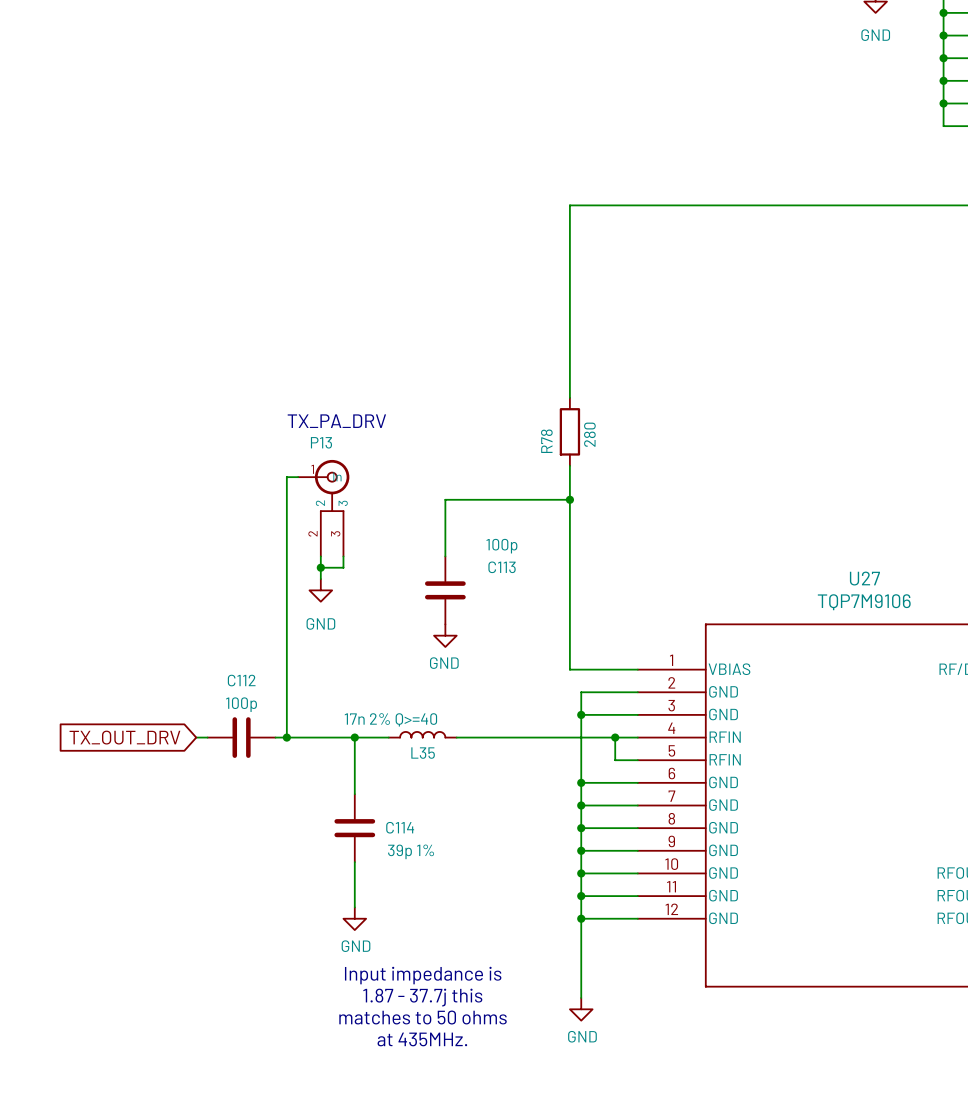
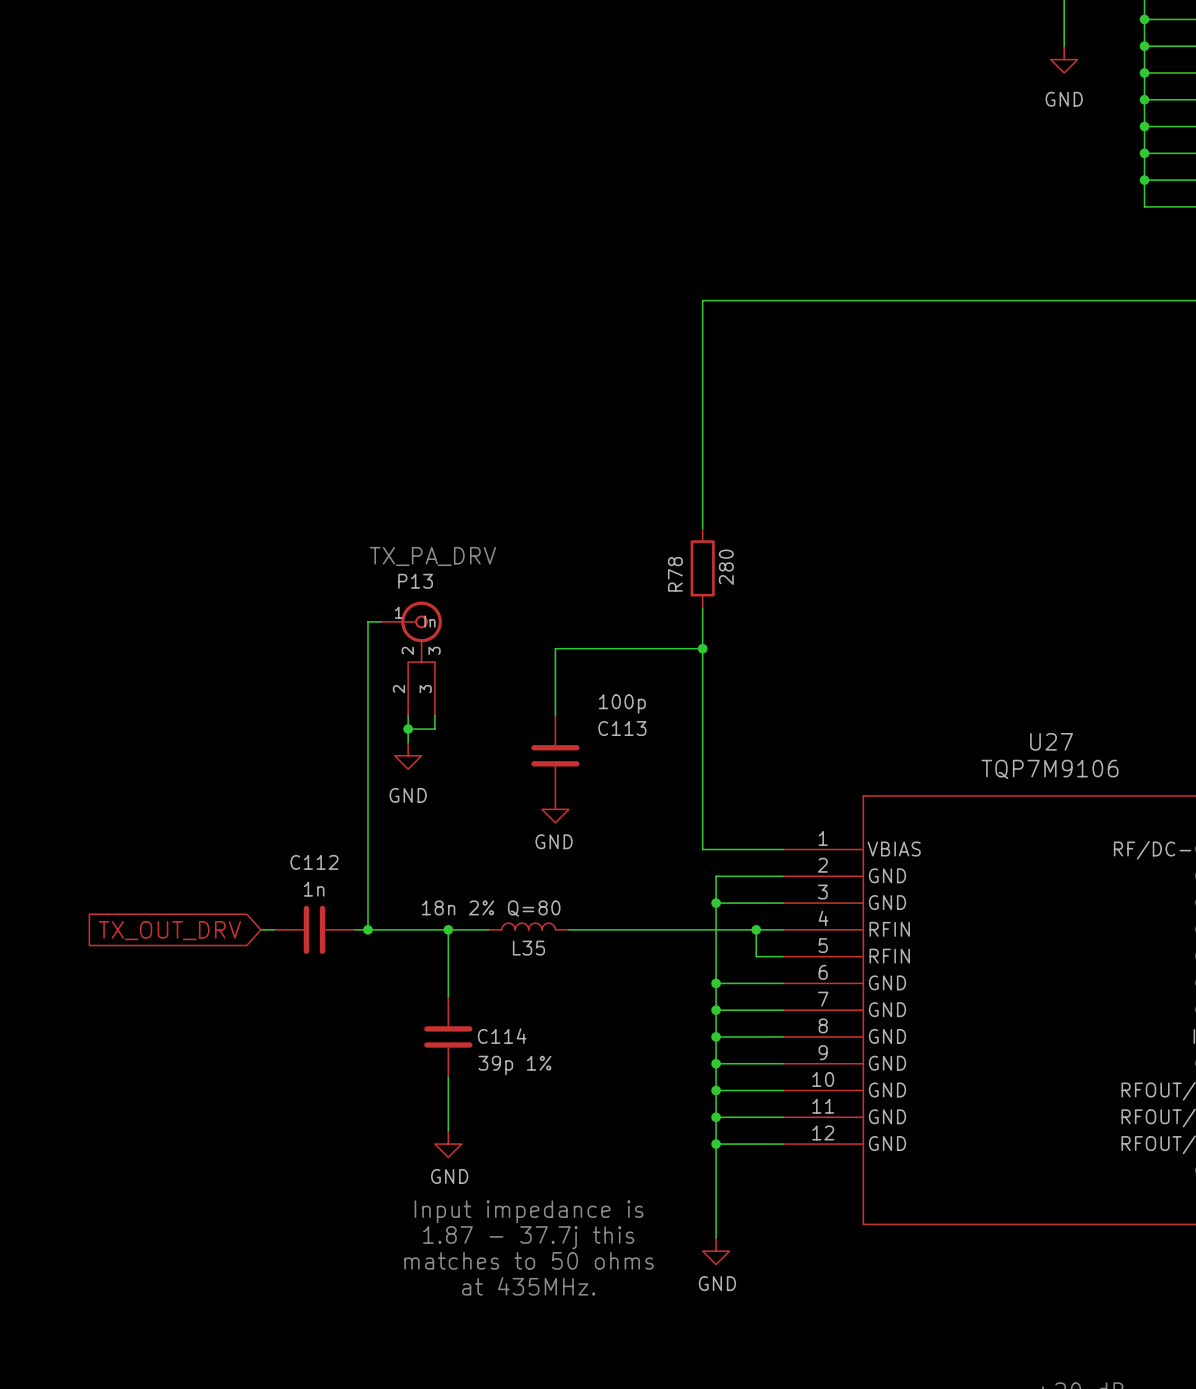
C112 value: 100p (241, 704) -> 1n (314, 889)
L35 value: 17n 2% Q>=40 (390, 719) -> 18n 2% Q=80 (491, 908)

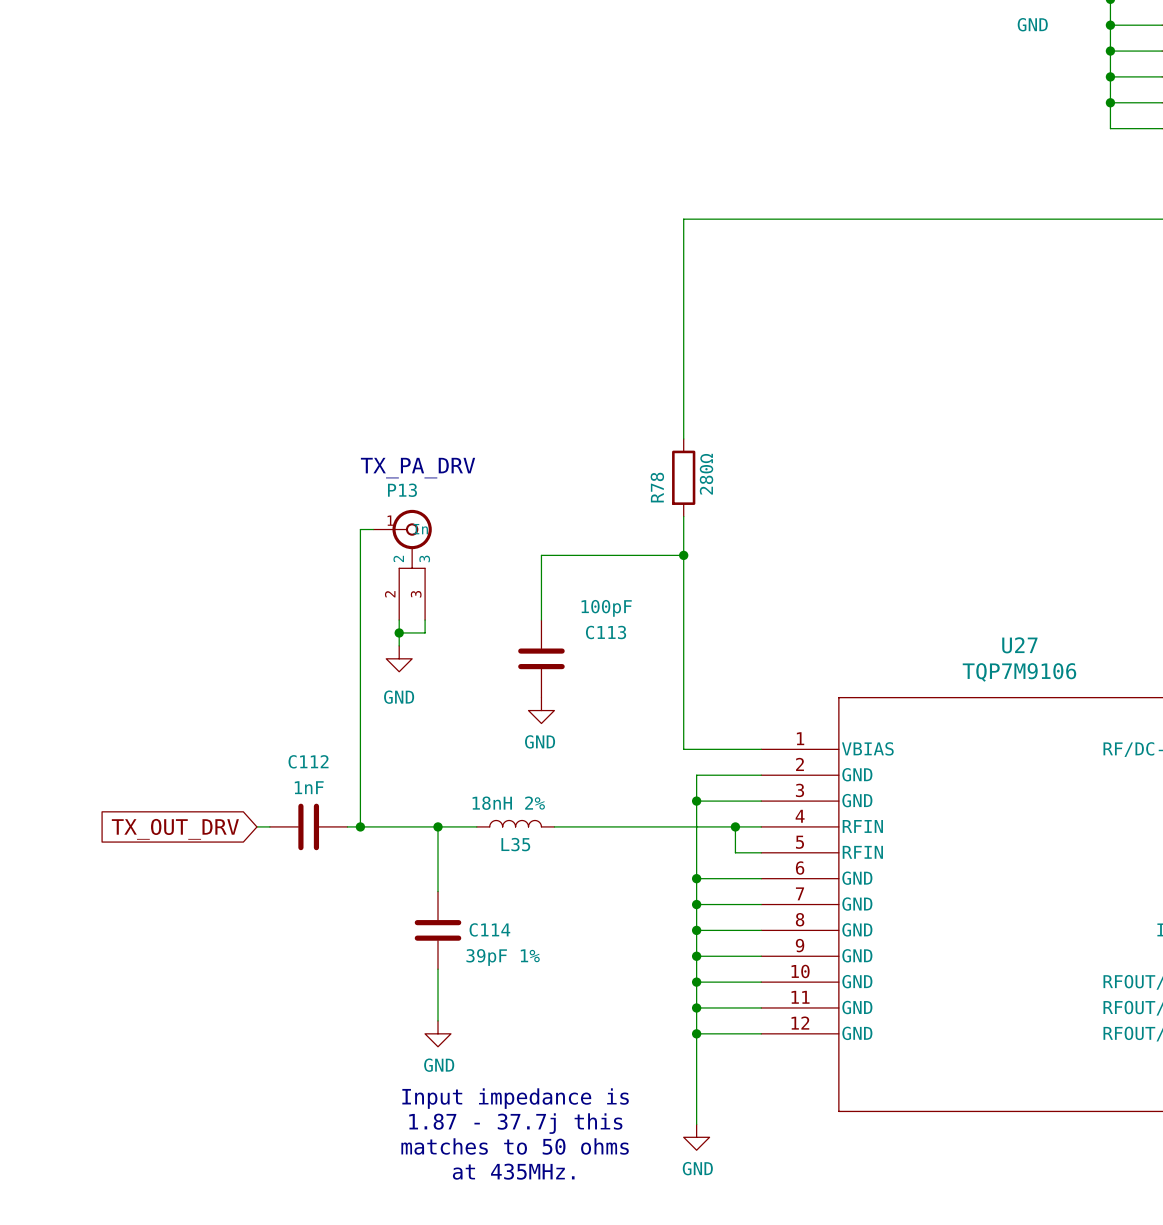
R78 value: 280 (726, 567) -> 280Ω (706, 474)
C113 value: 100p (622, 703) -> 100pF (606, 608)
C112 value: 1n (314, 889) -> 1nF (309, 787)
L35 value: 18n 2% Q=80 (491, 908) -> 18nH 2% (508, 803)
C114 value: 39p 1% (514, 1065) -> 39pF 1% (503, 957)

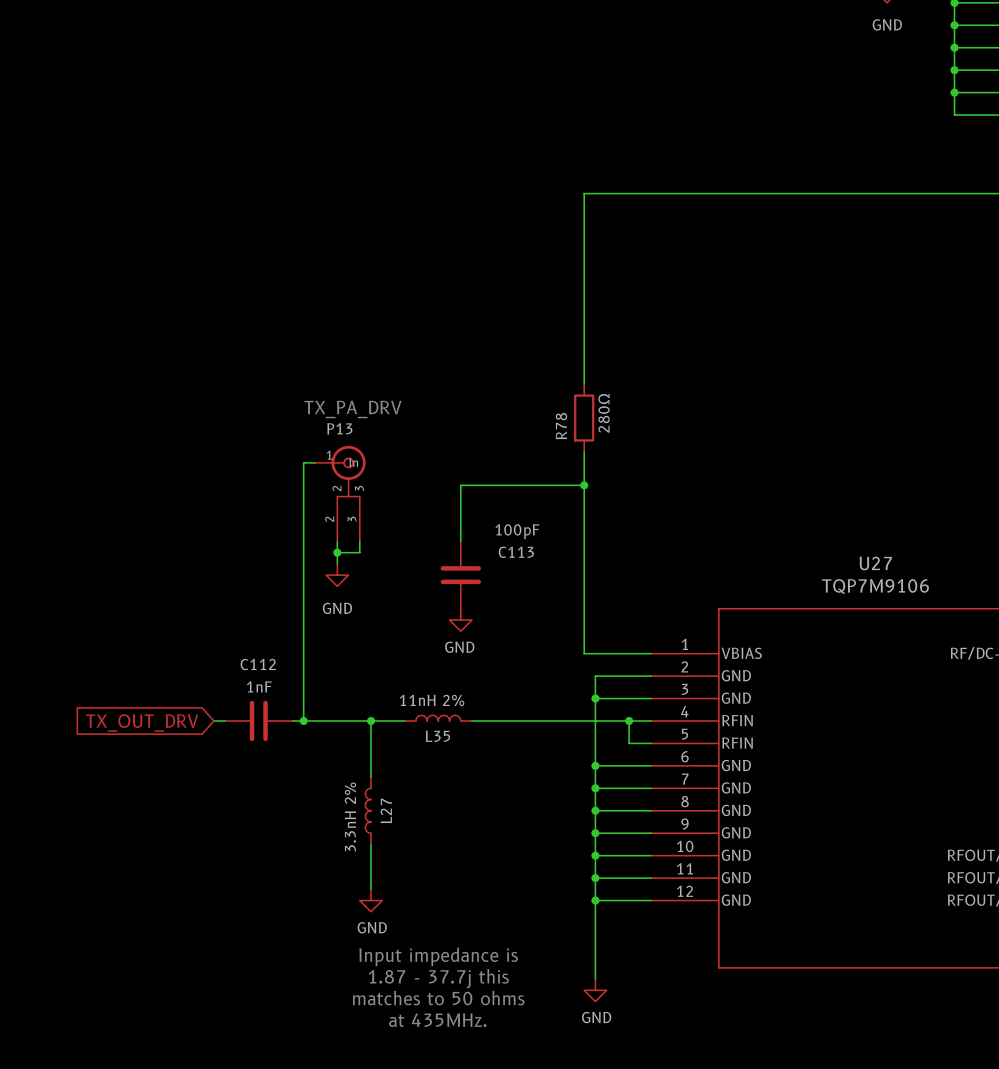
L35 value: 18nH 2% (508, 803) -> 11nH 2% (432, 700)
L27: none -> 3.3nH 2% (368, 810)
C114: 39pF 1% (438, 930) -> none

